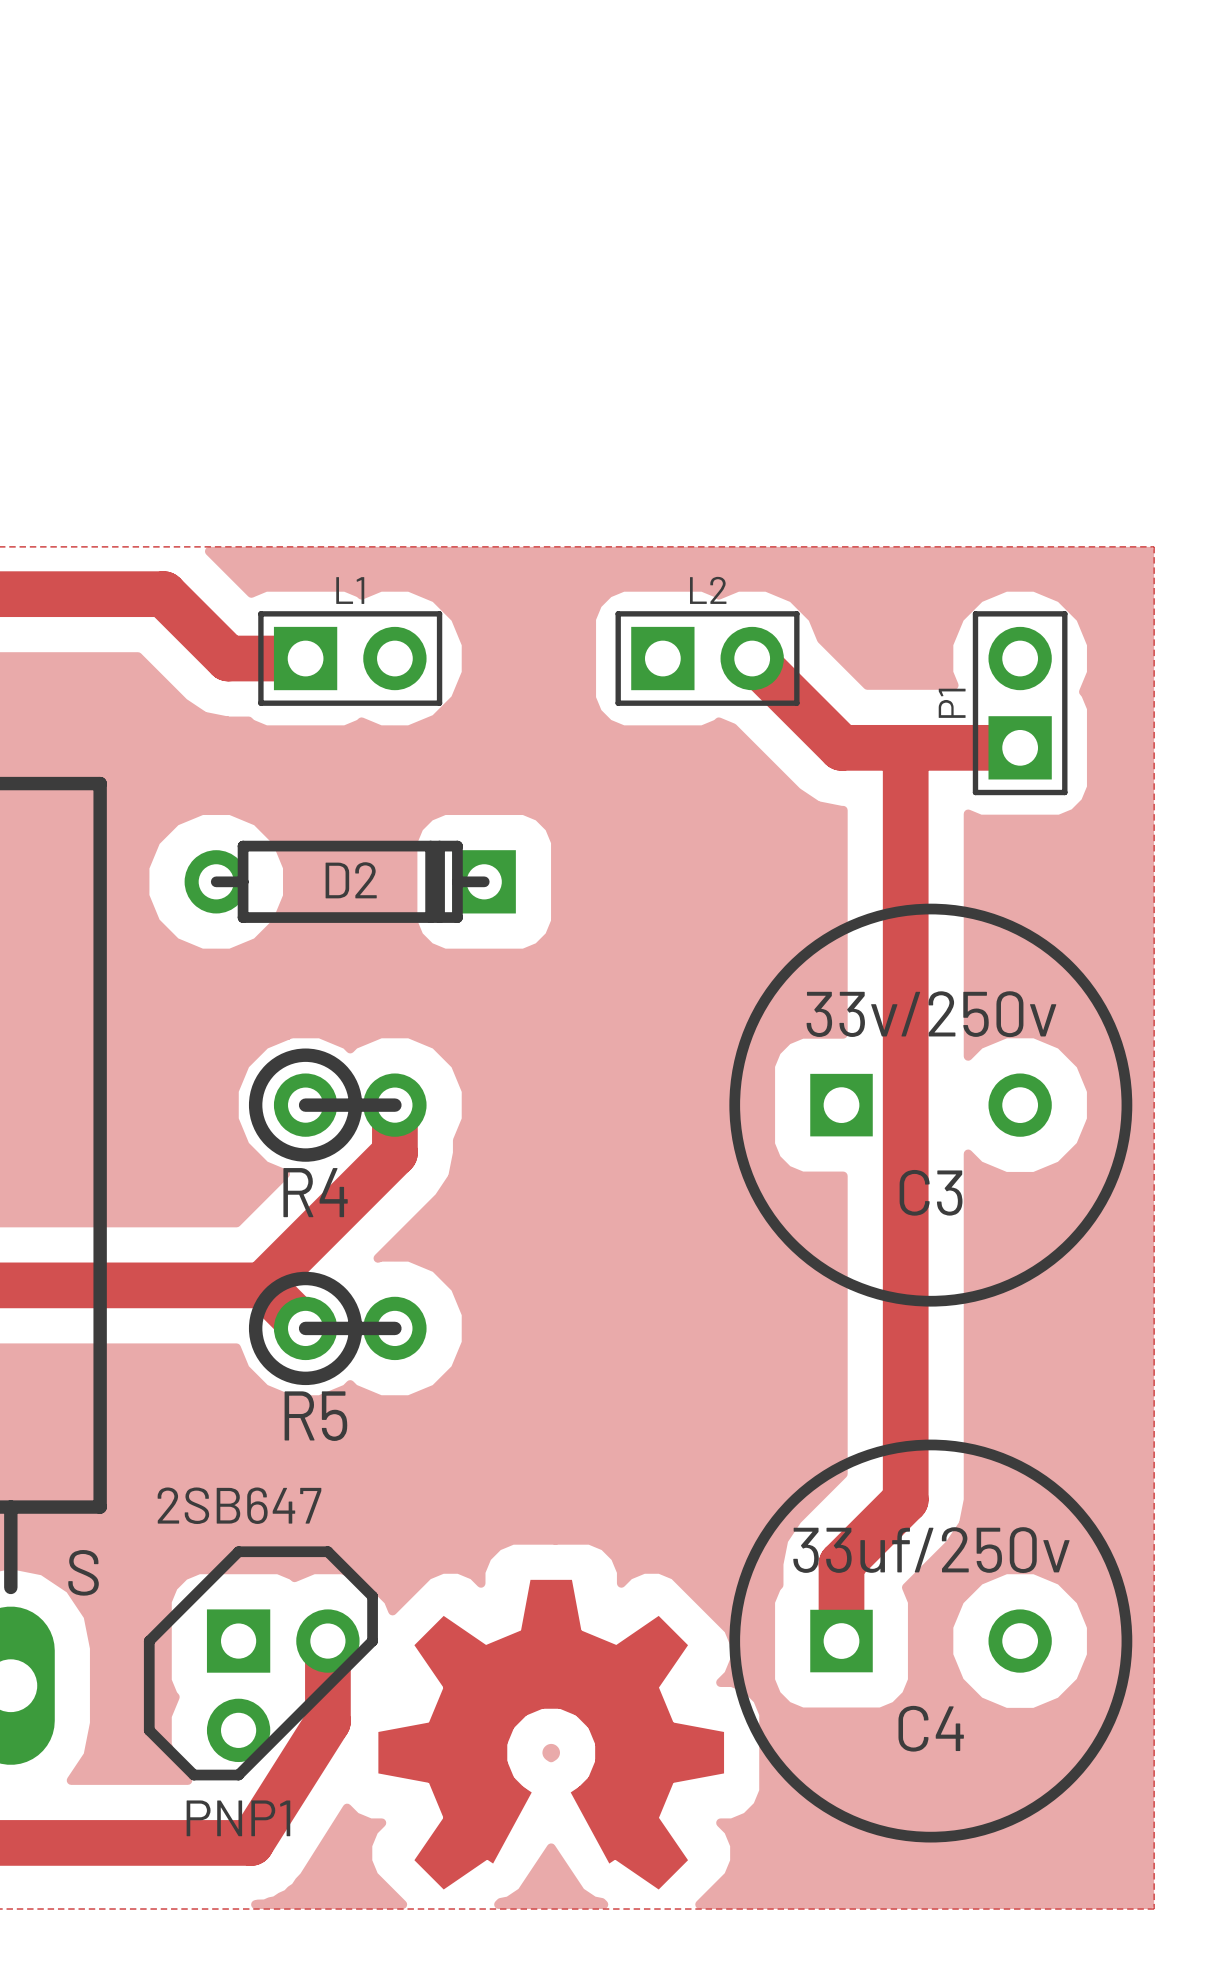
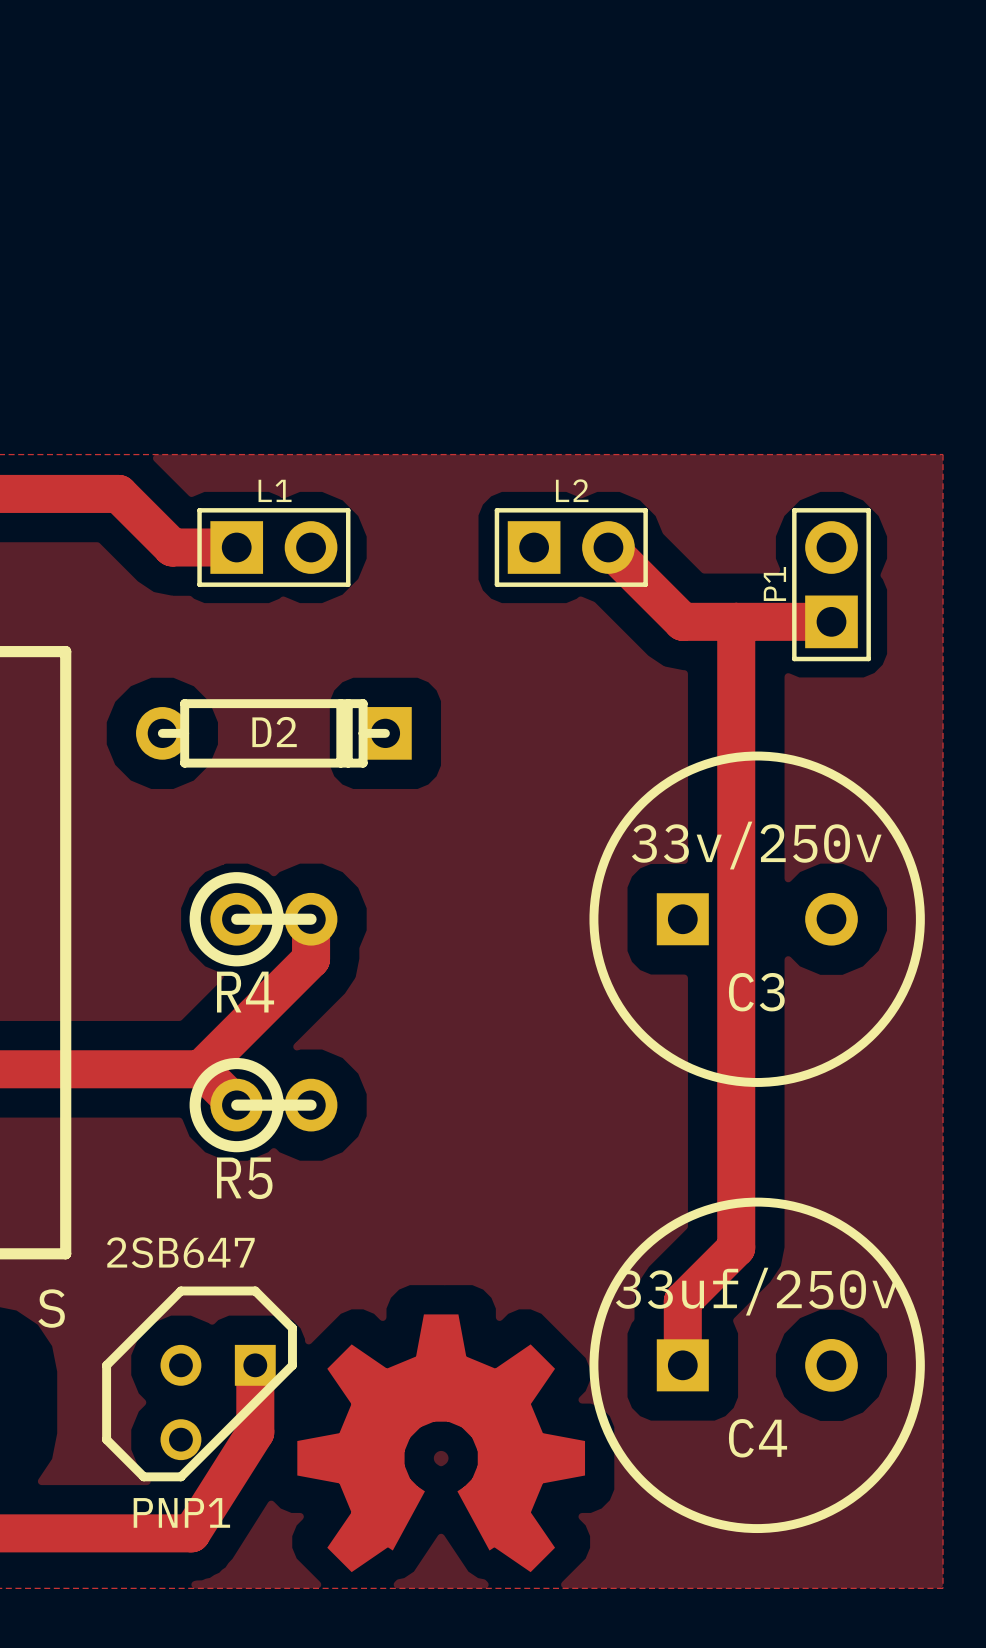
PNP1 footprint: [143, 1546, 378, 1781] -> [102, 1286, 297, 1482]

